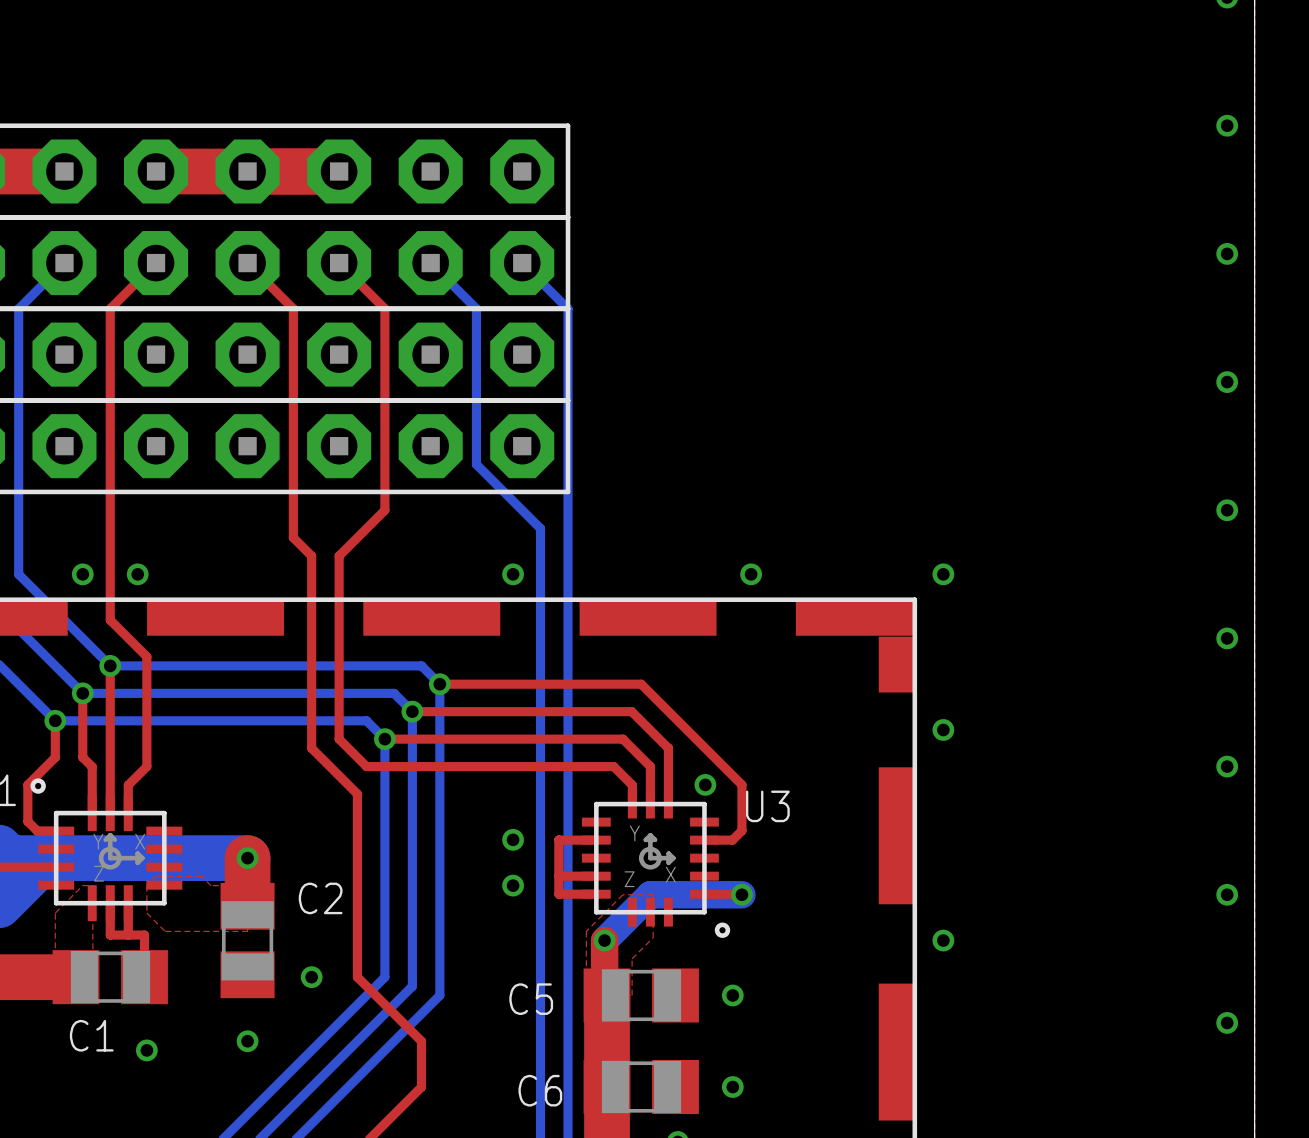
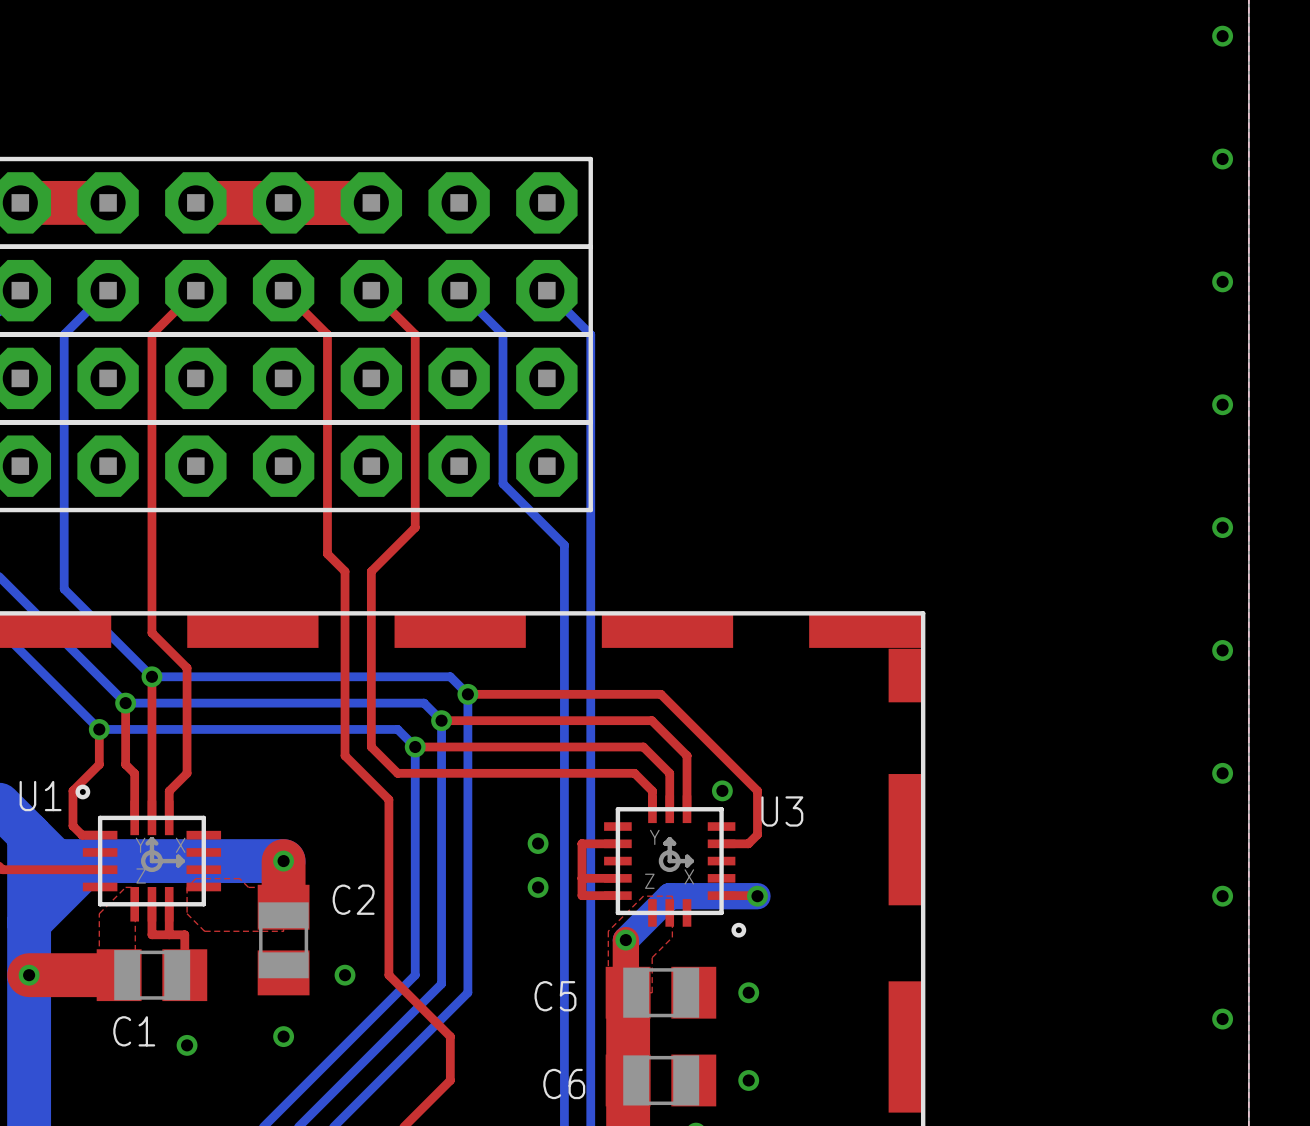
via: (82, 574) -> none
via: (137, 574) -> none
via: (513, 574) -> none
via: (751, 574) -> none
via: (943, 574) -> none
via: (943, 729) -> none
via: (943, 940) -> none

